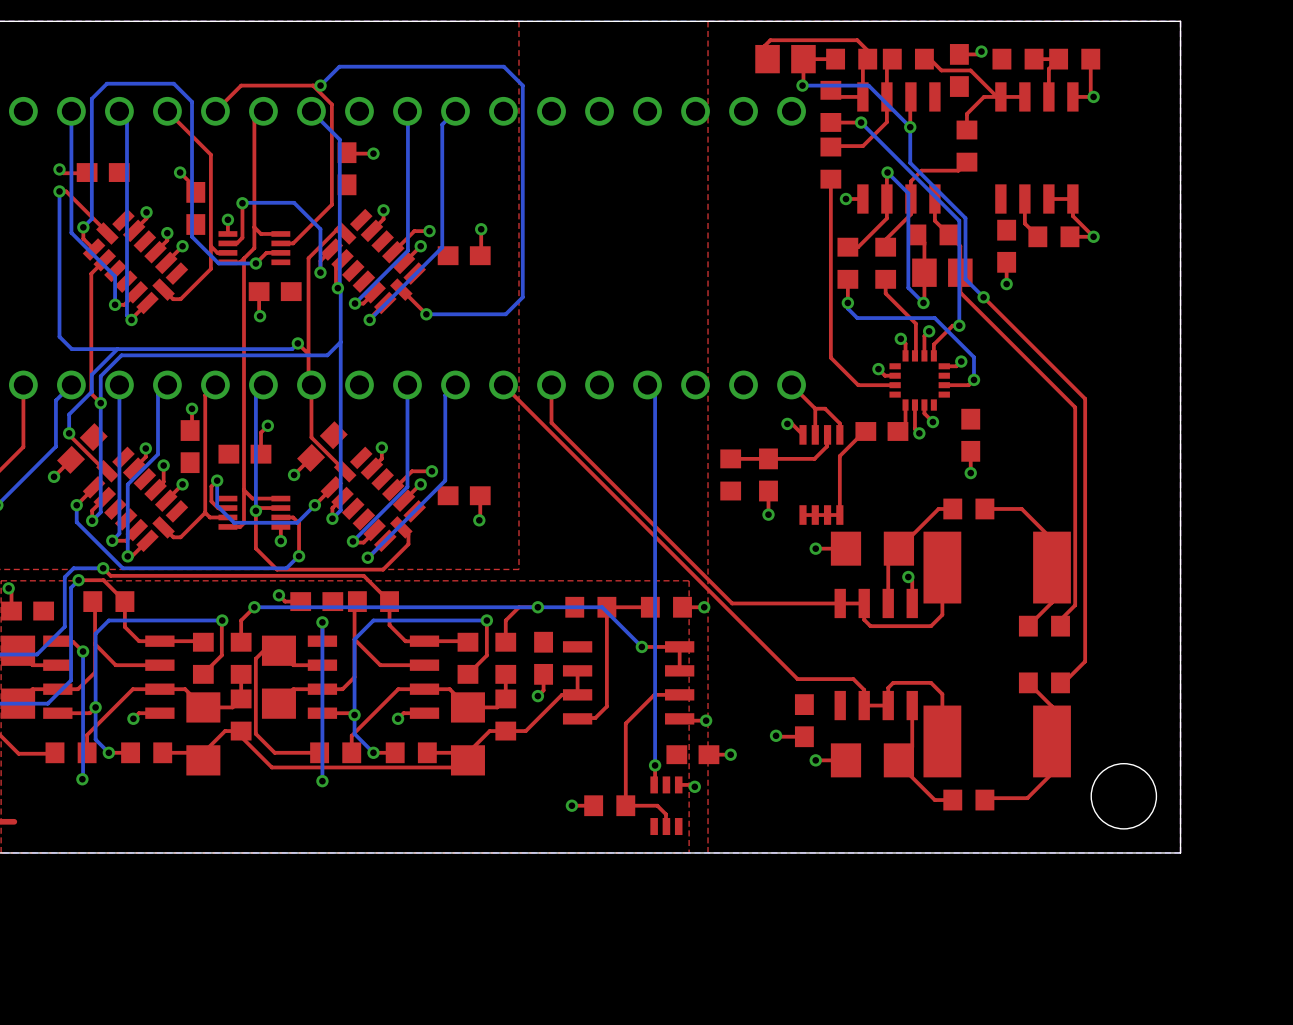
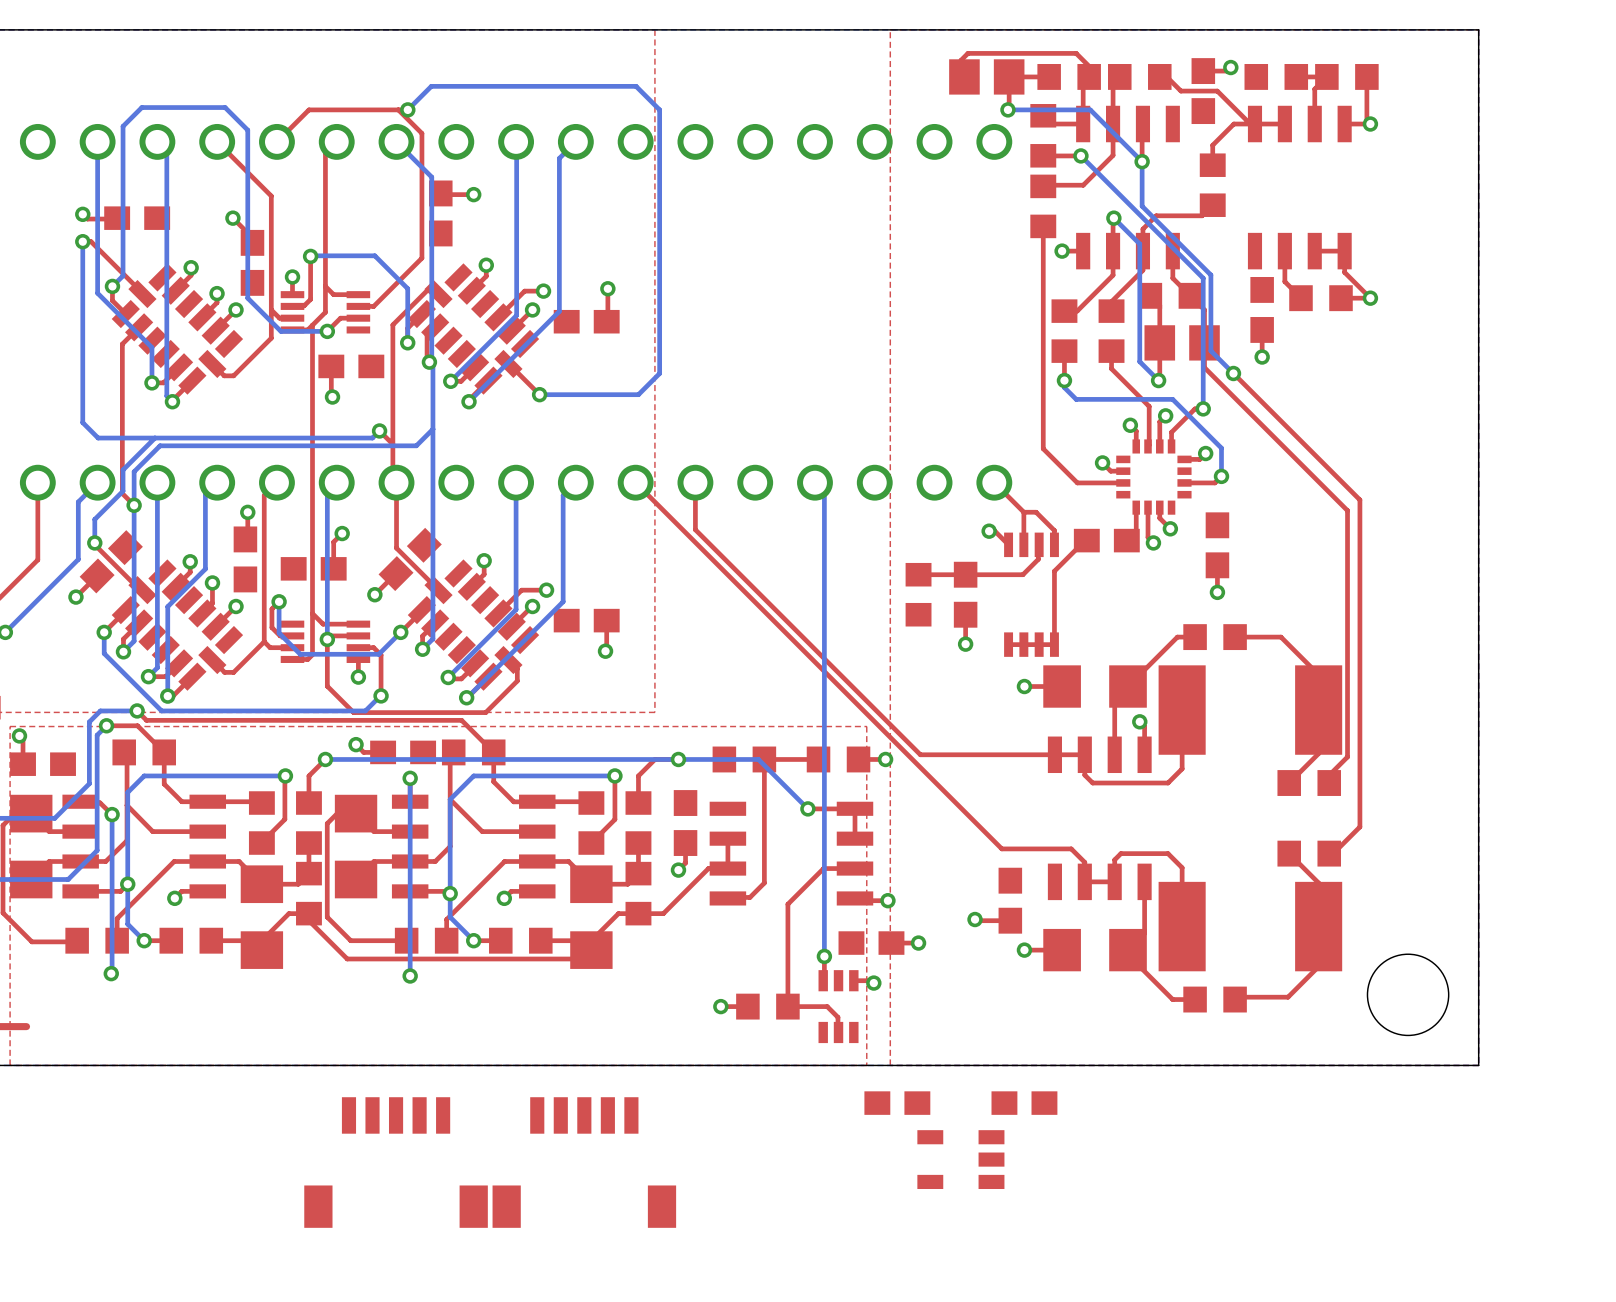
part: none -> (897, 1103)
part: none -> (1024, 1103)
part: none -> (960, 1159)
part: none -> (396, 1162)
part: none -> (584, 1162)

